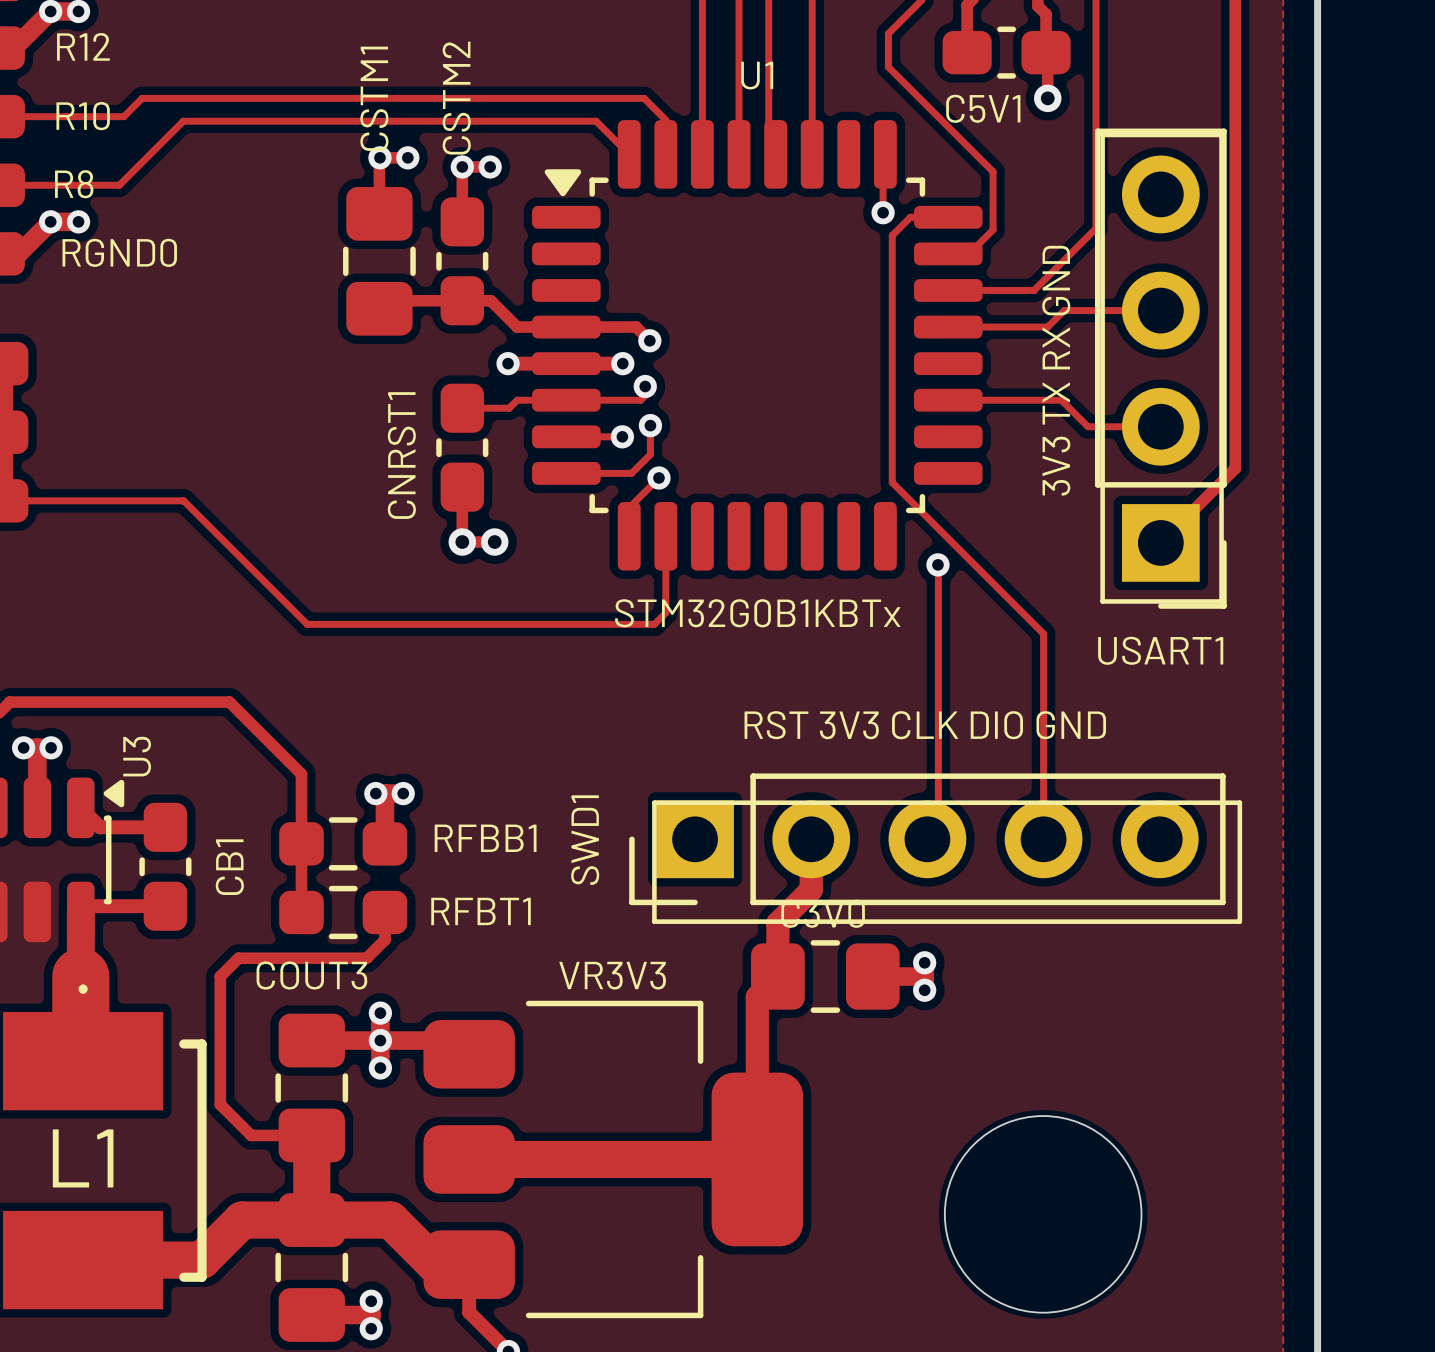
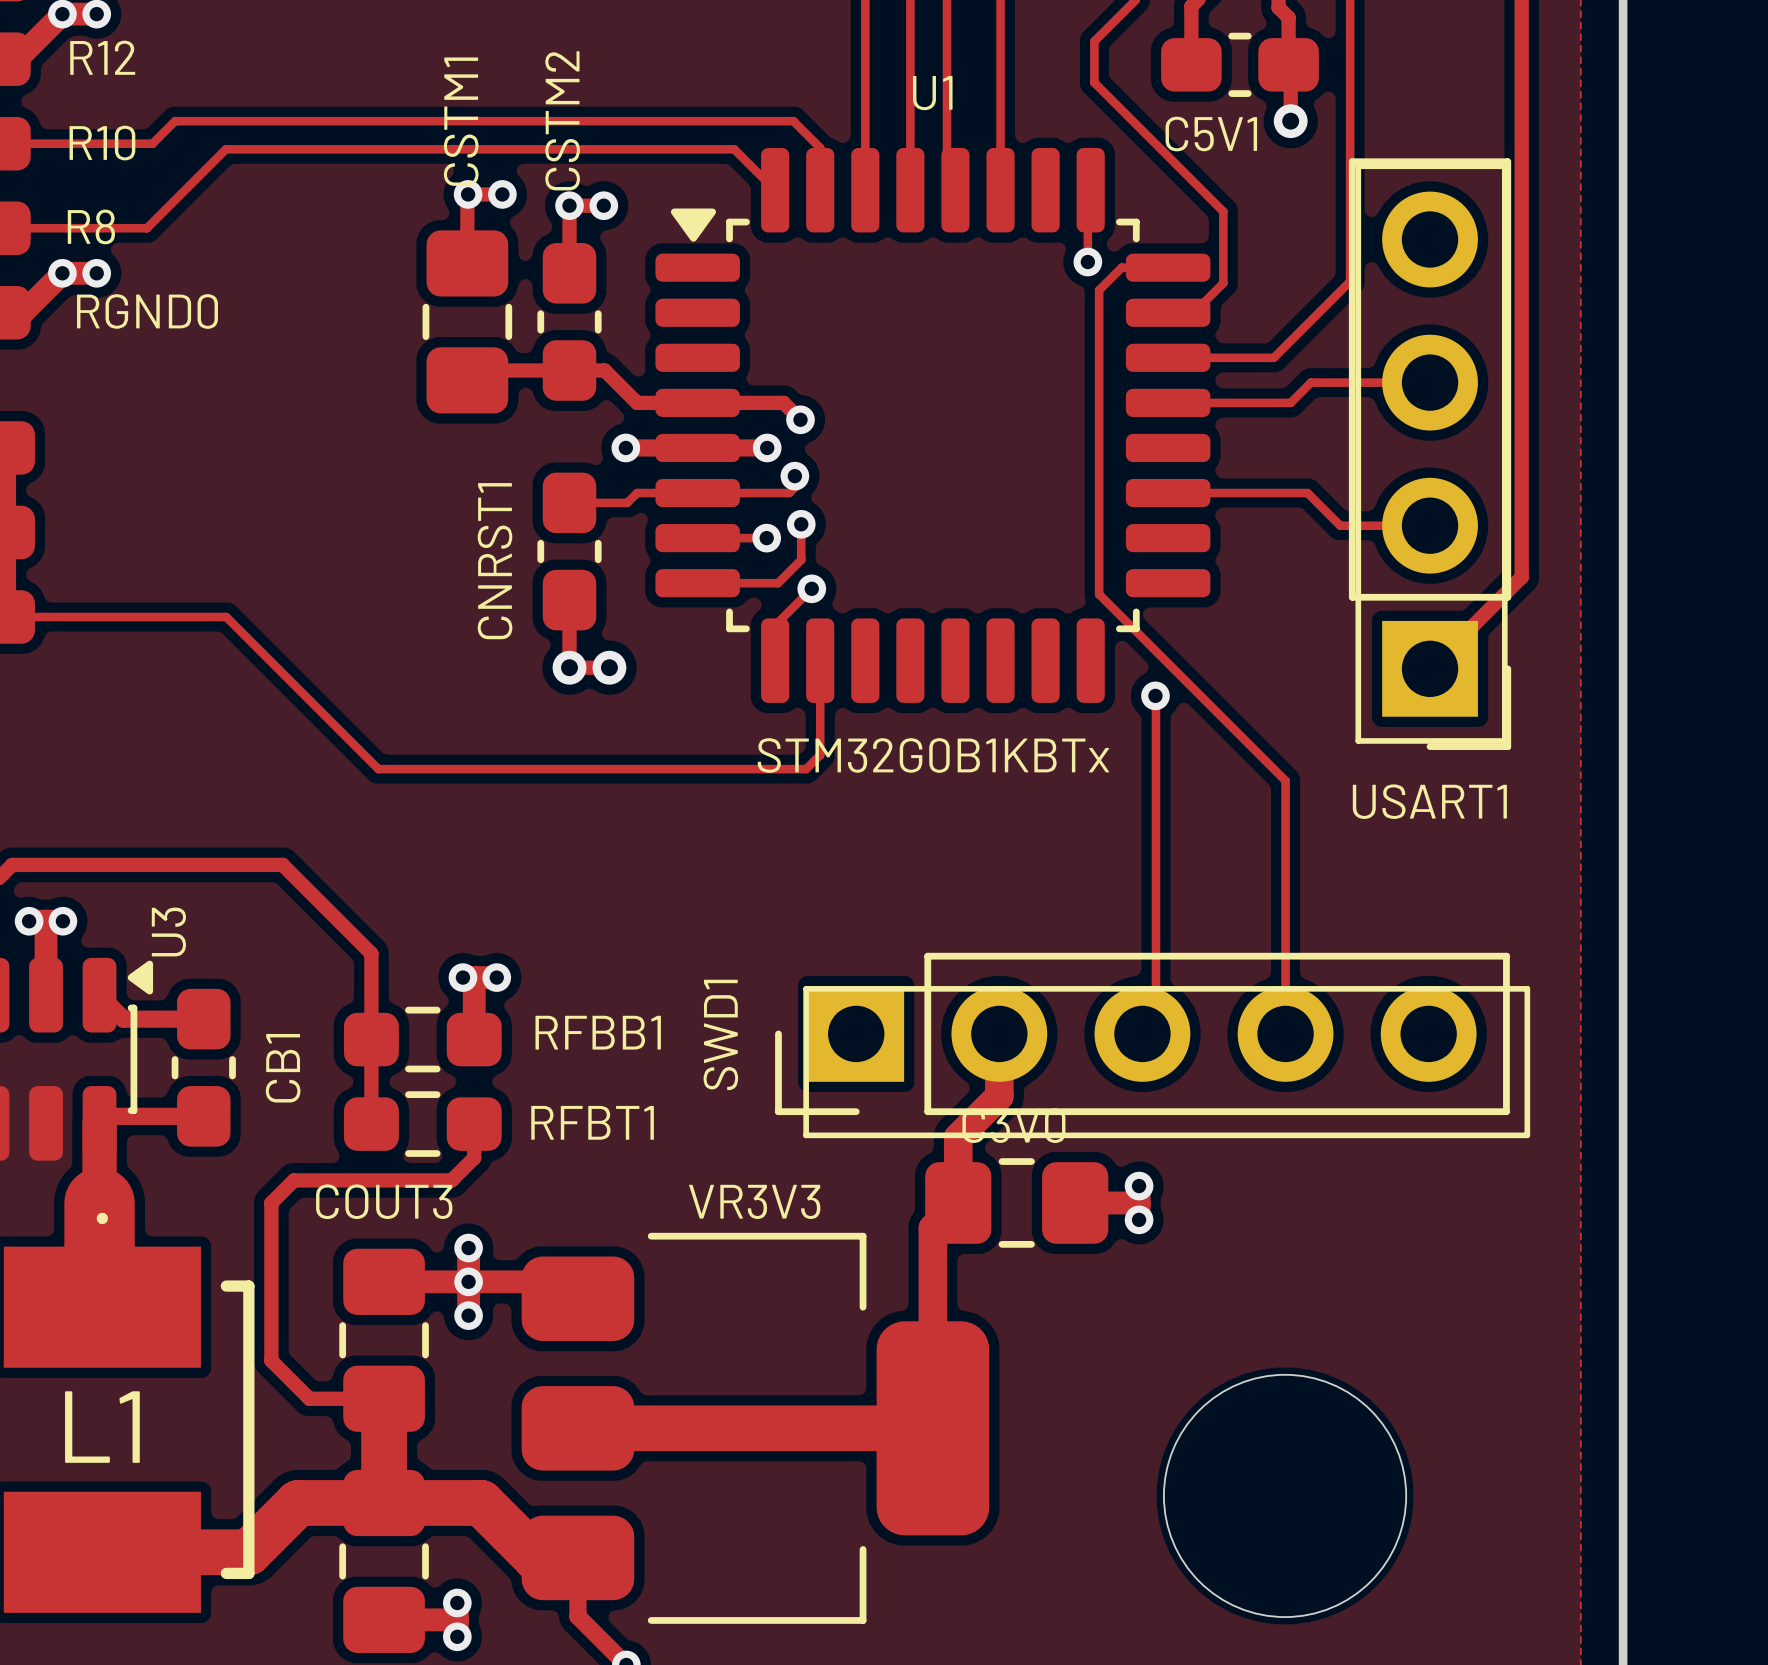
USART1 value: 3V3 TX RX GND (1056, 370) -> none
SWD1 value: RST 3V3 CLK DIO GND (925, 725) -> none

